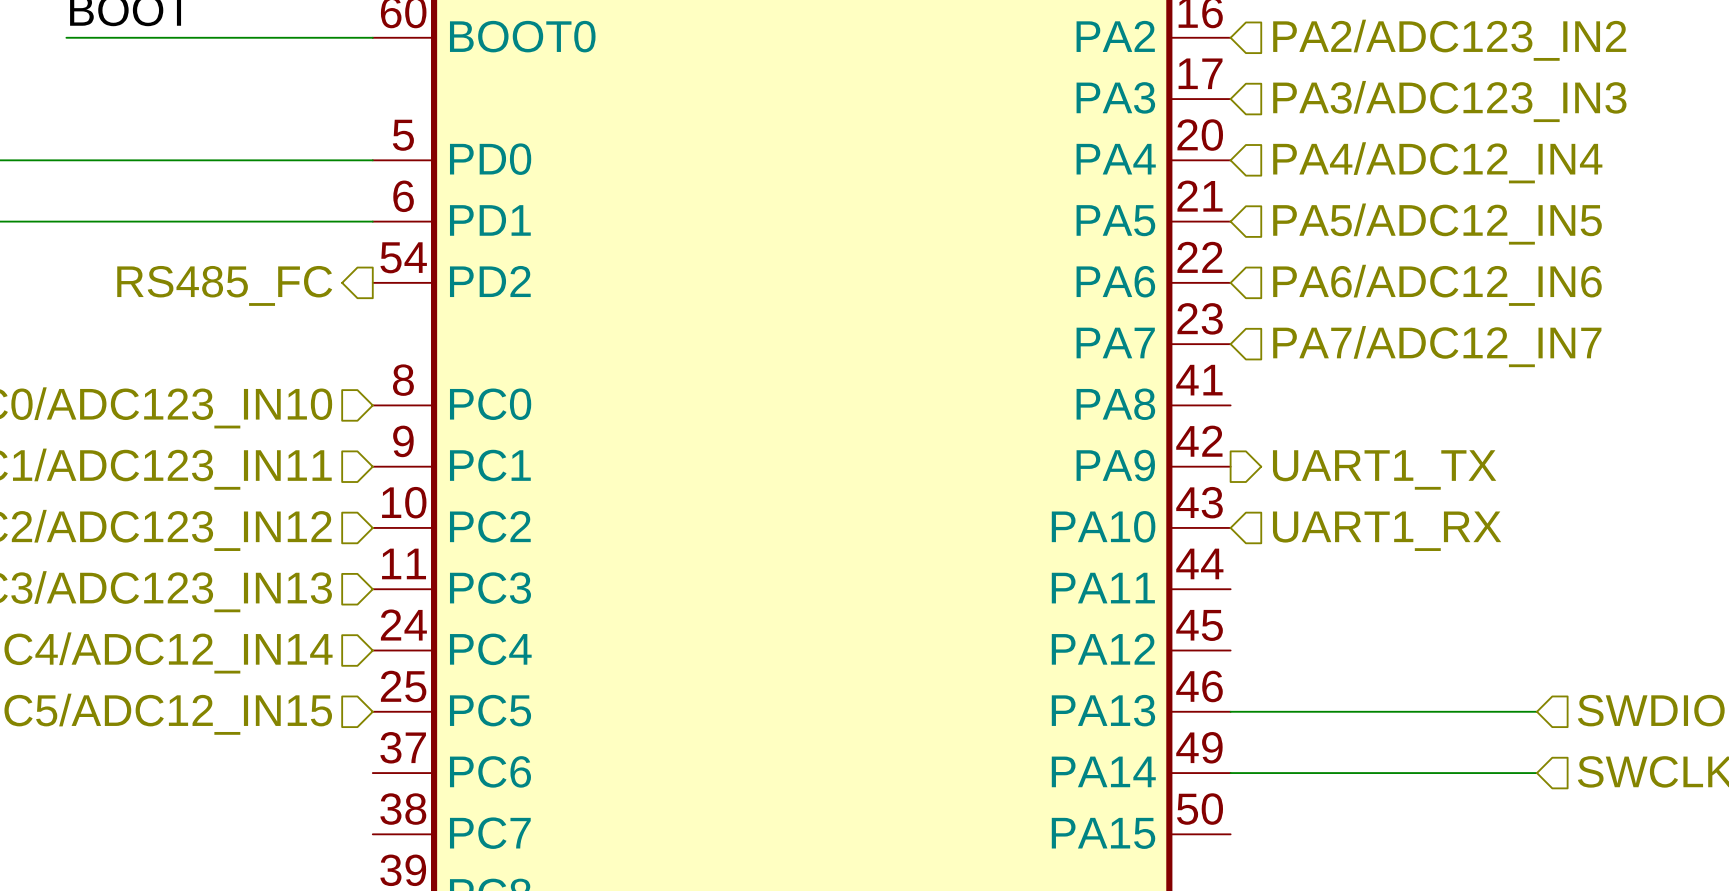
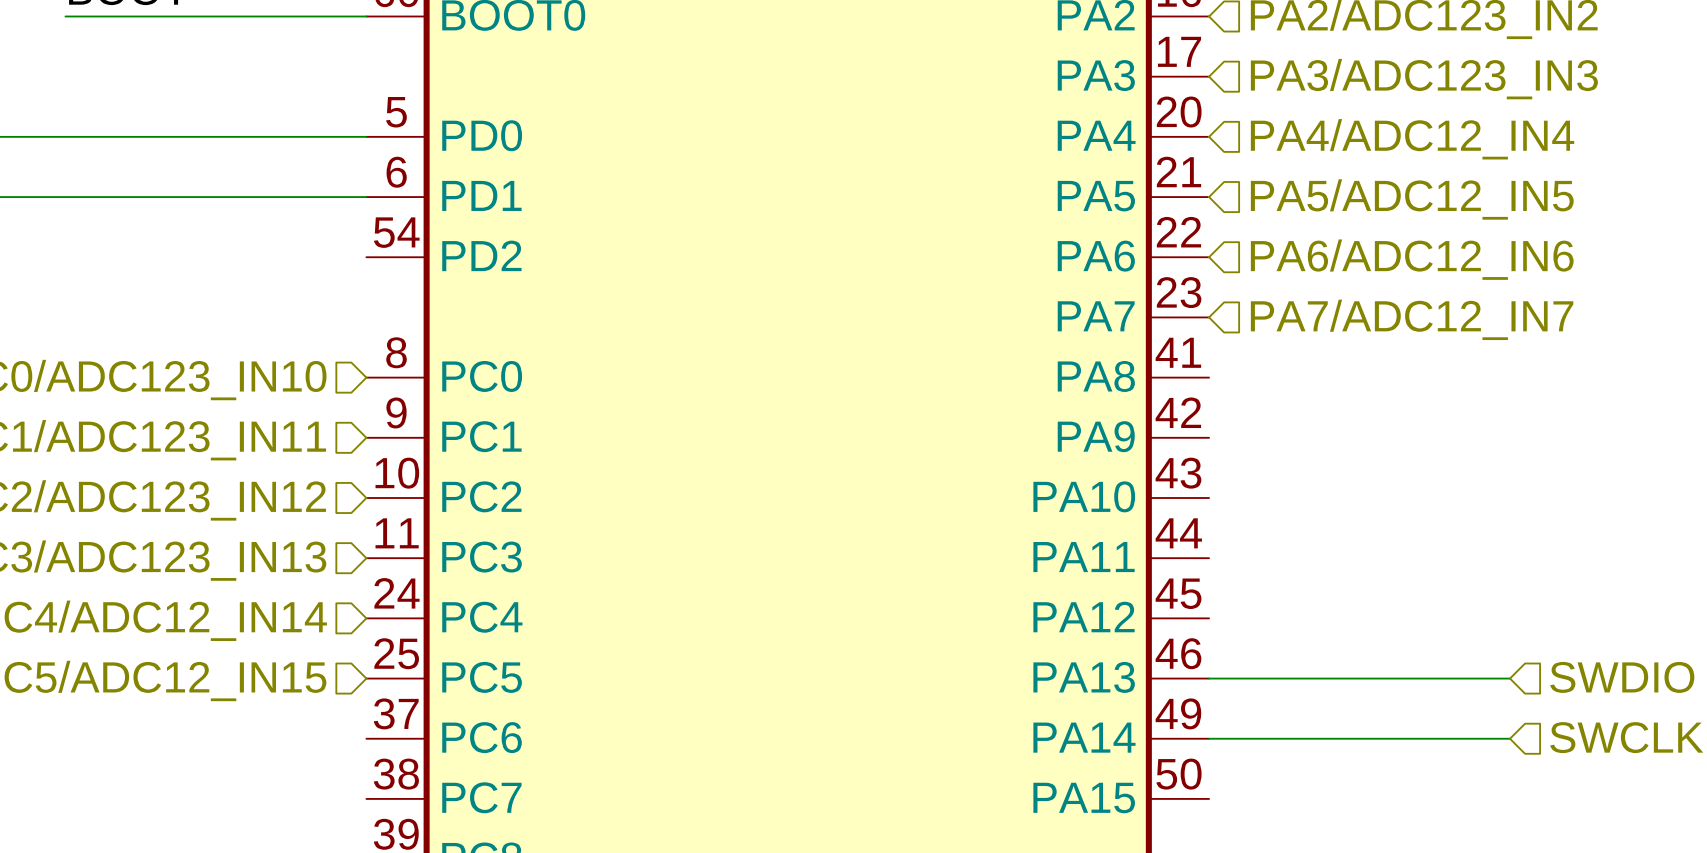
hierarchical label: RS485_FC (224, 285) -> none
hierarchical label: UART1_TX (1384, 469) -> none
hierarchical label: UART1_RX (1387, 531) -> none

